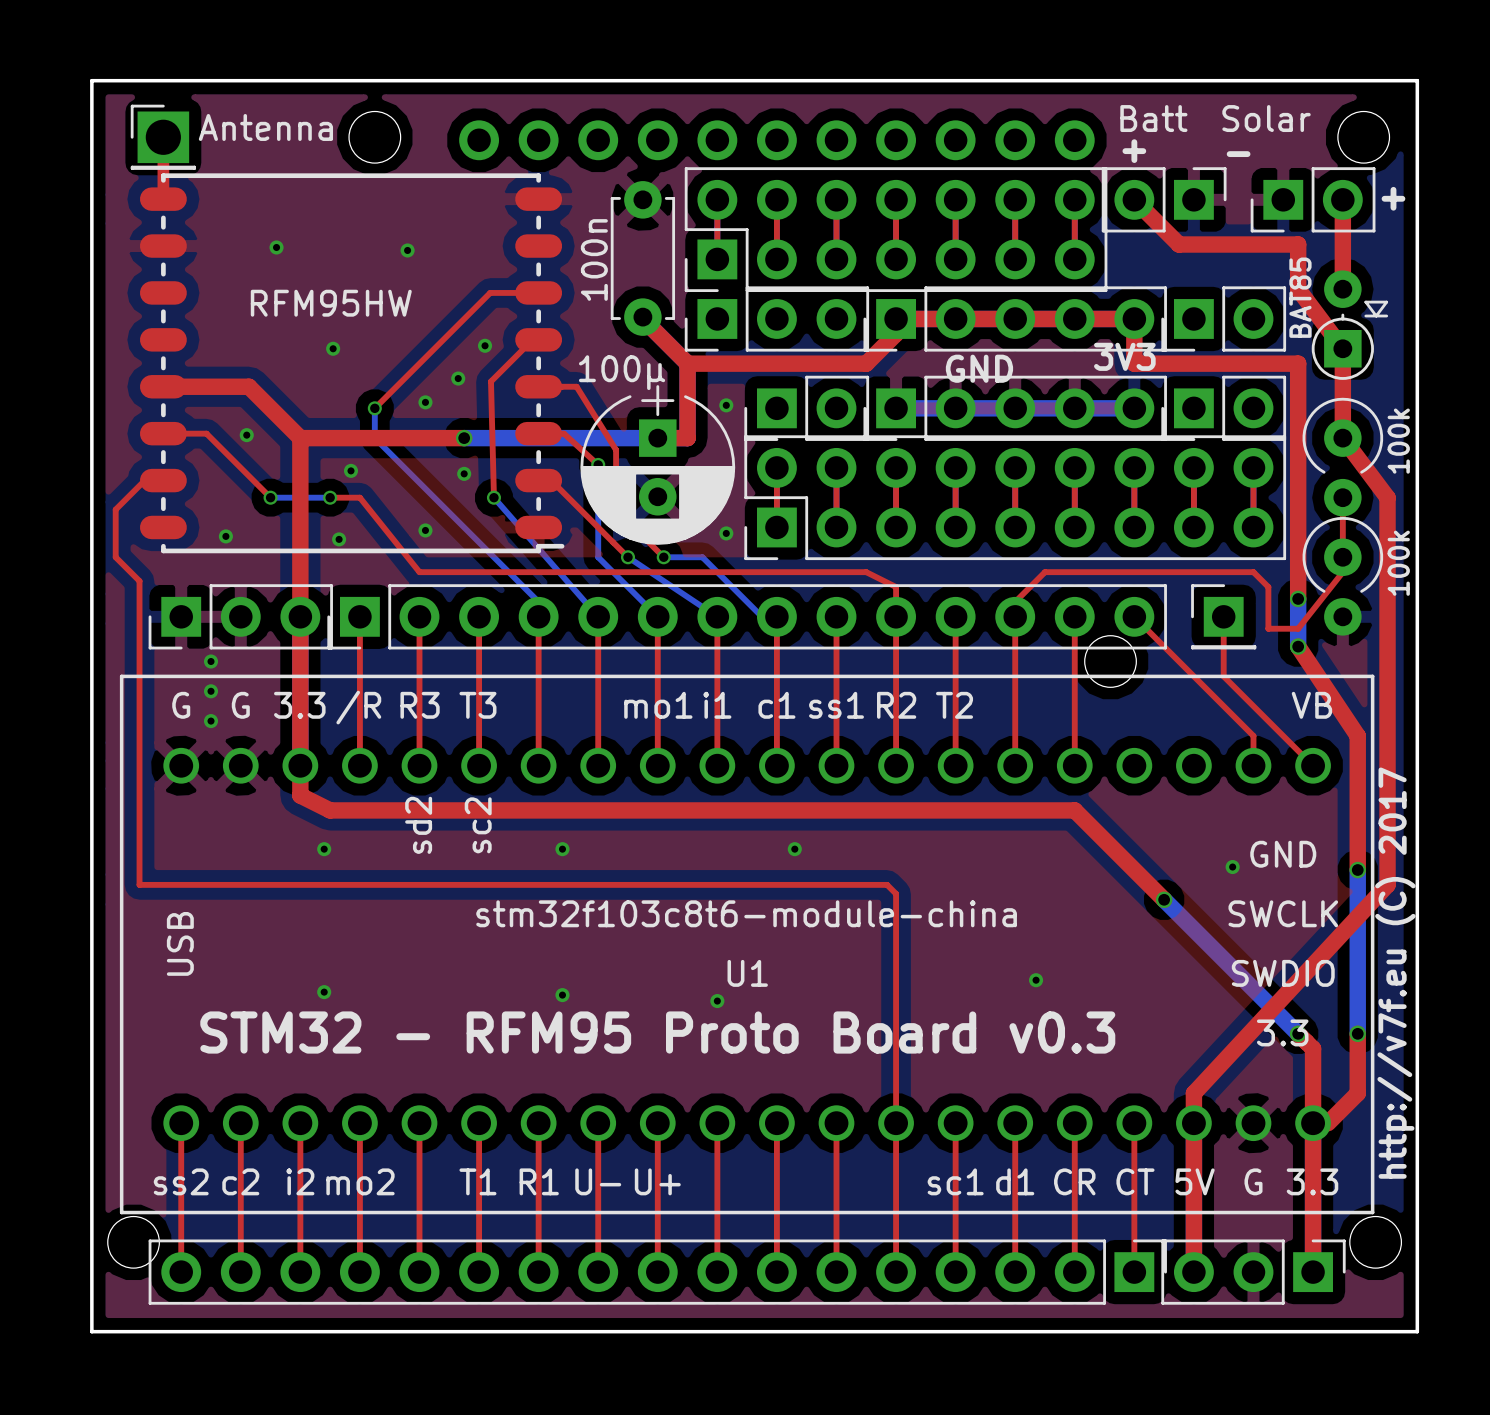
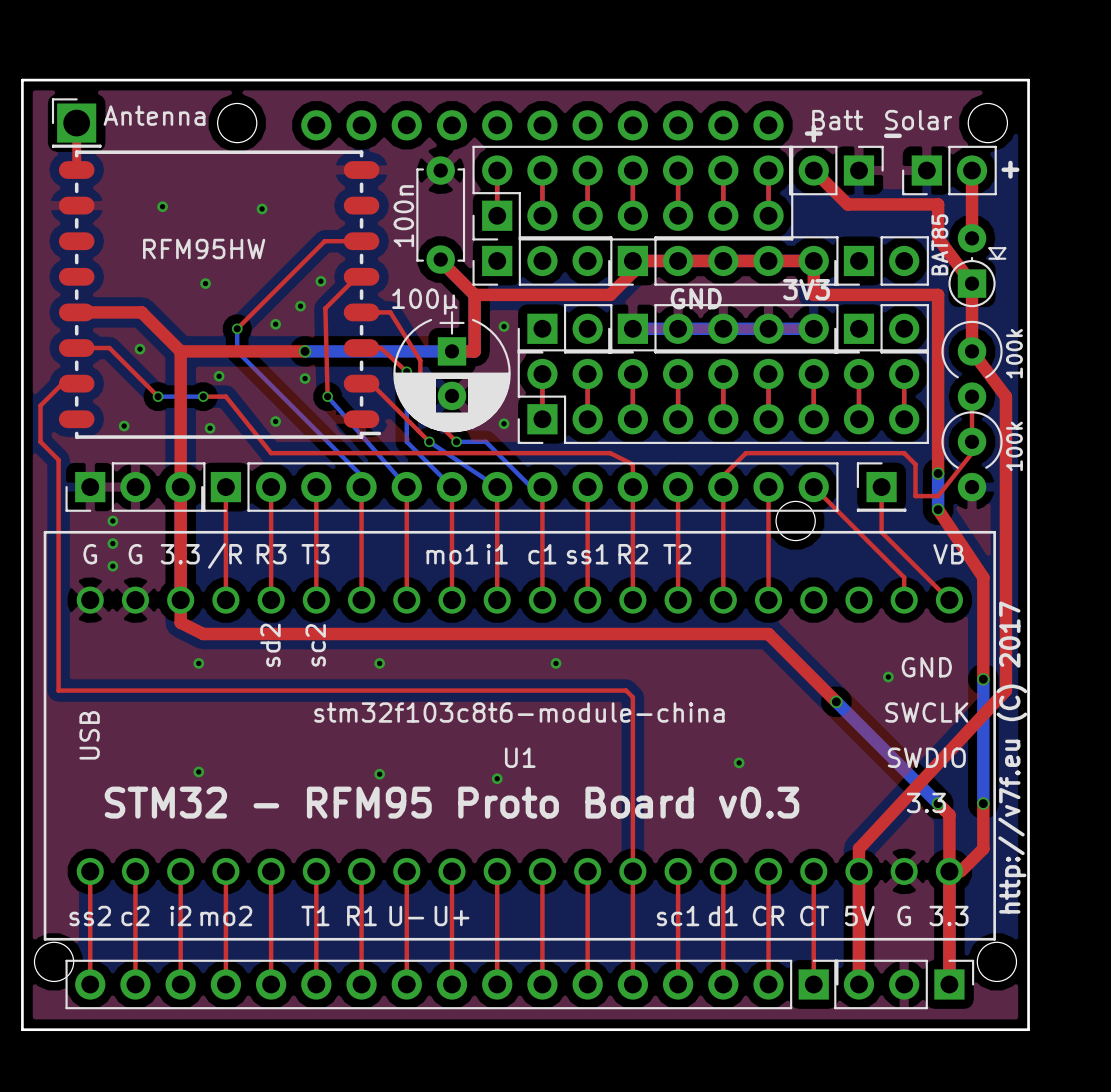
part value position: Batt (1153, 118) -> Batt (837, 120)
part value position: Solar (1266, 118) -> Solar (918, 120)

